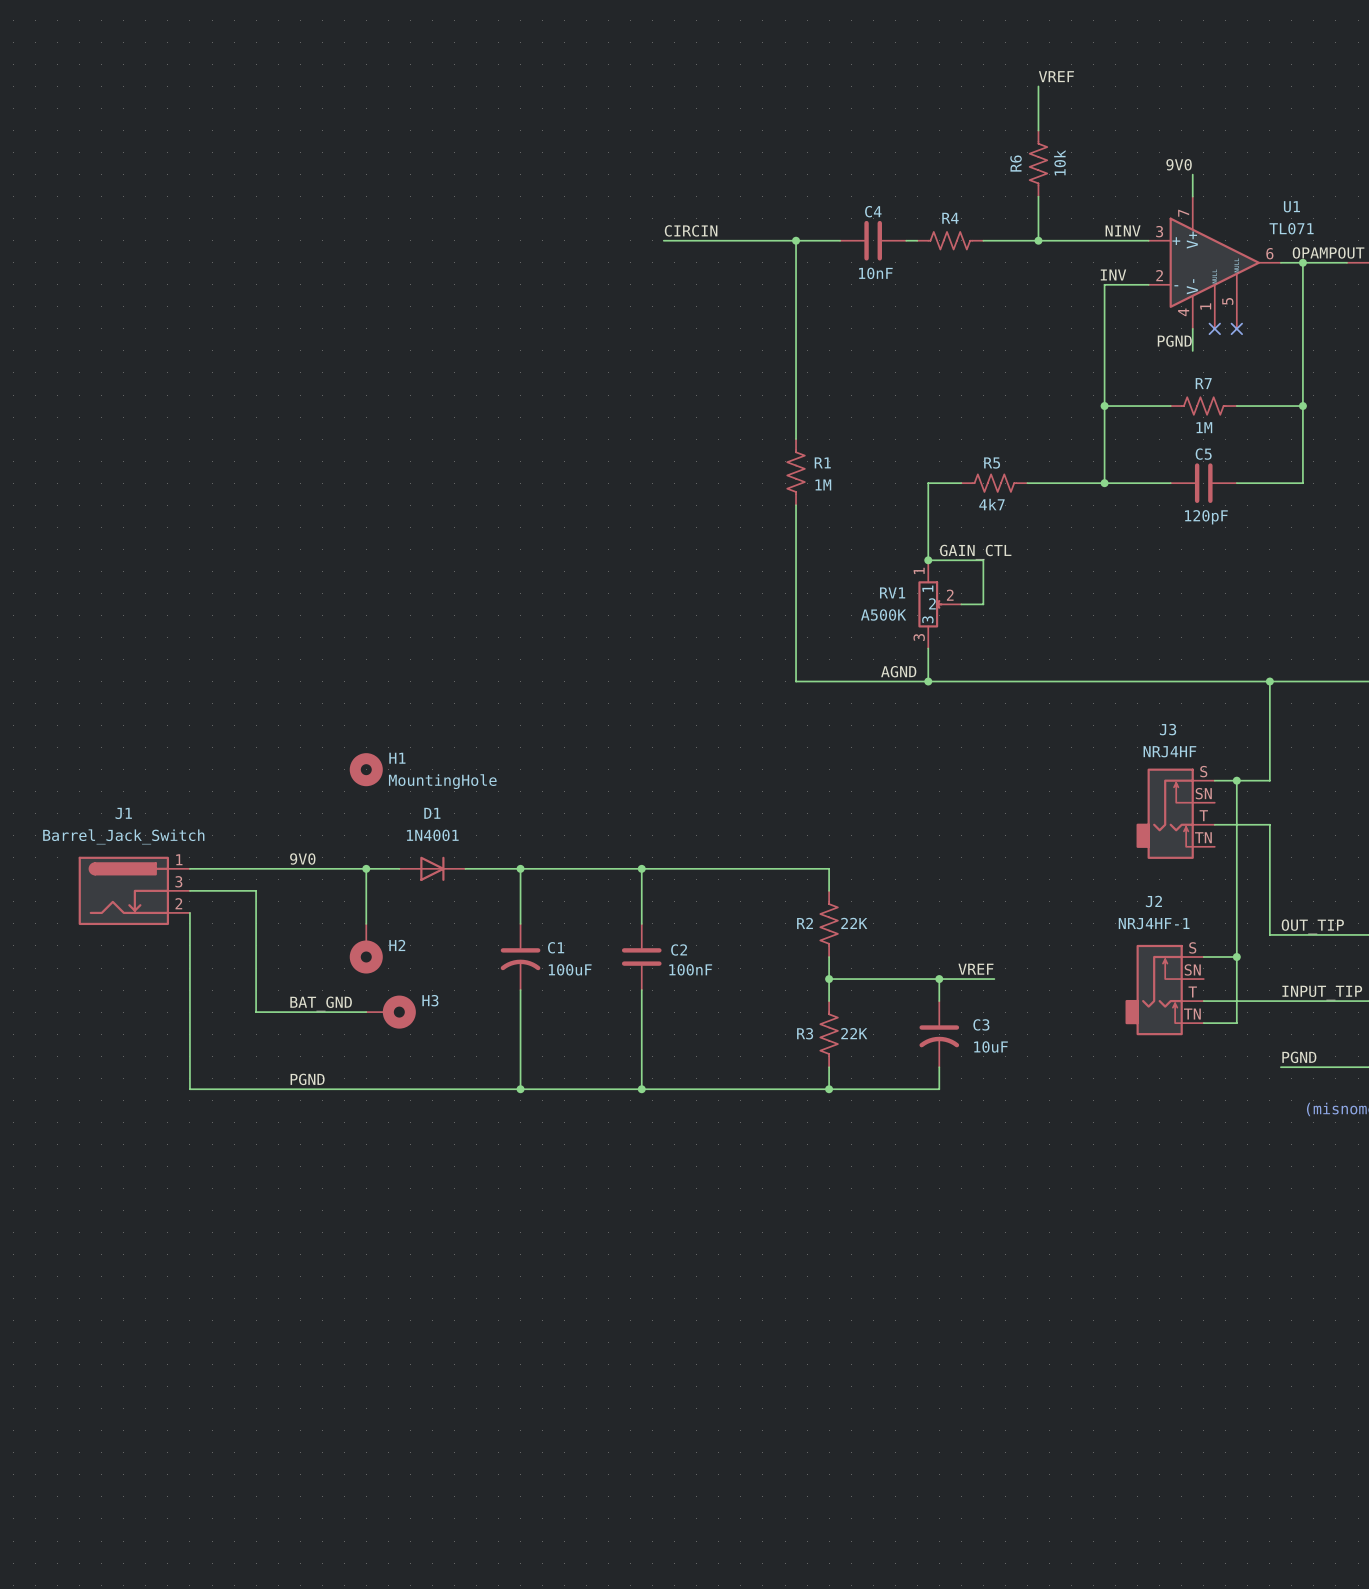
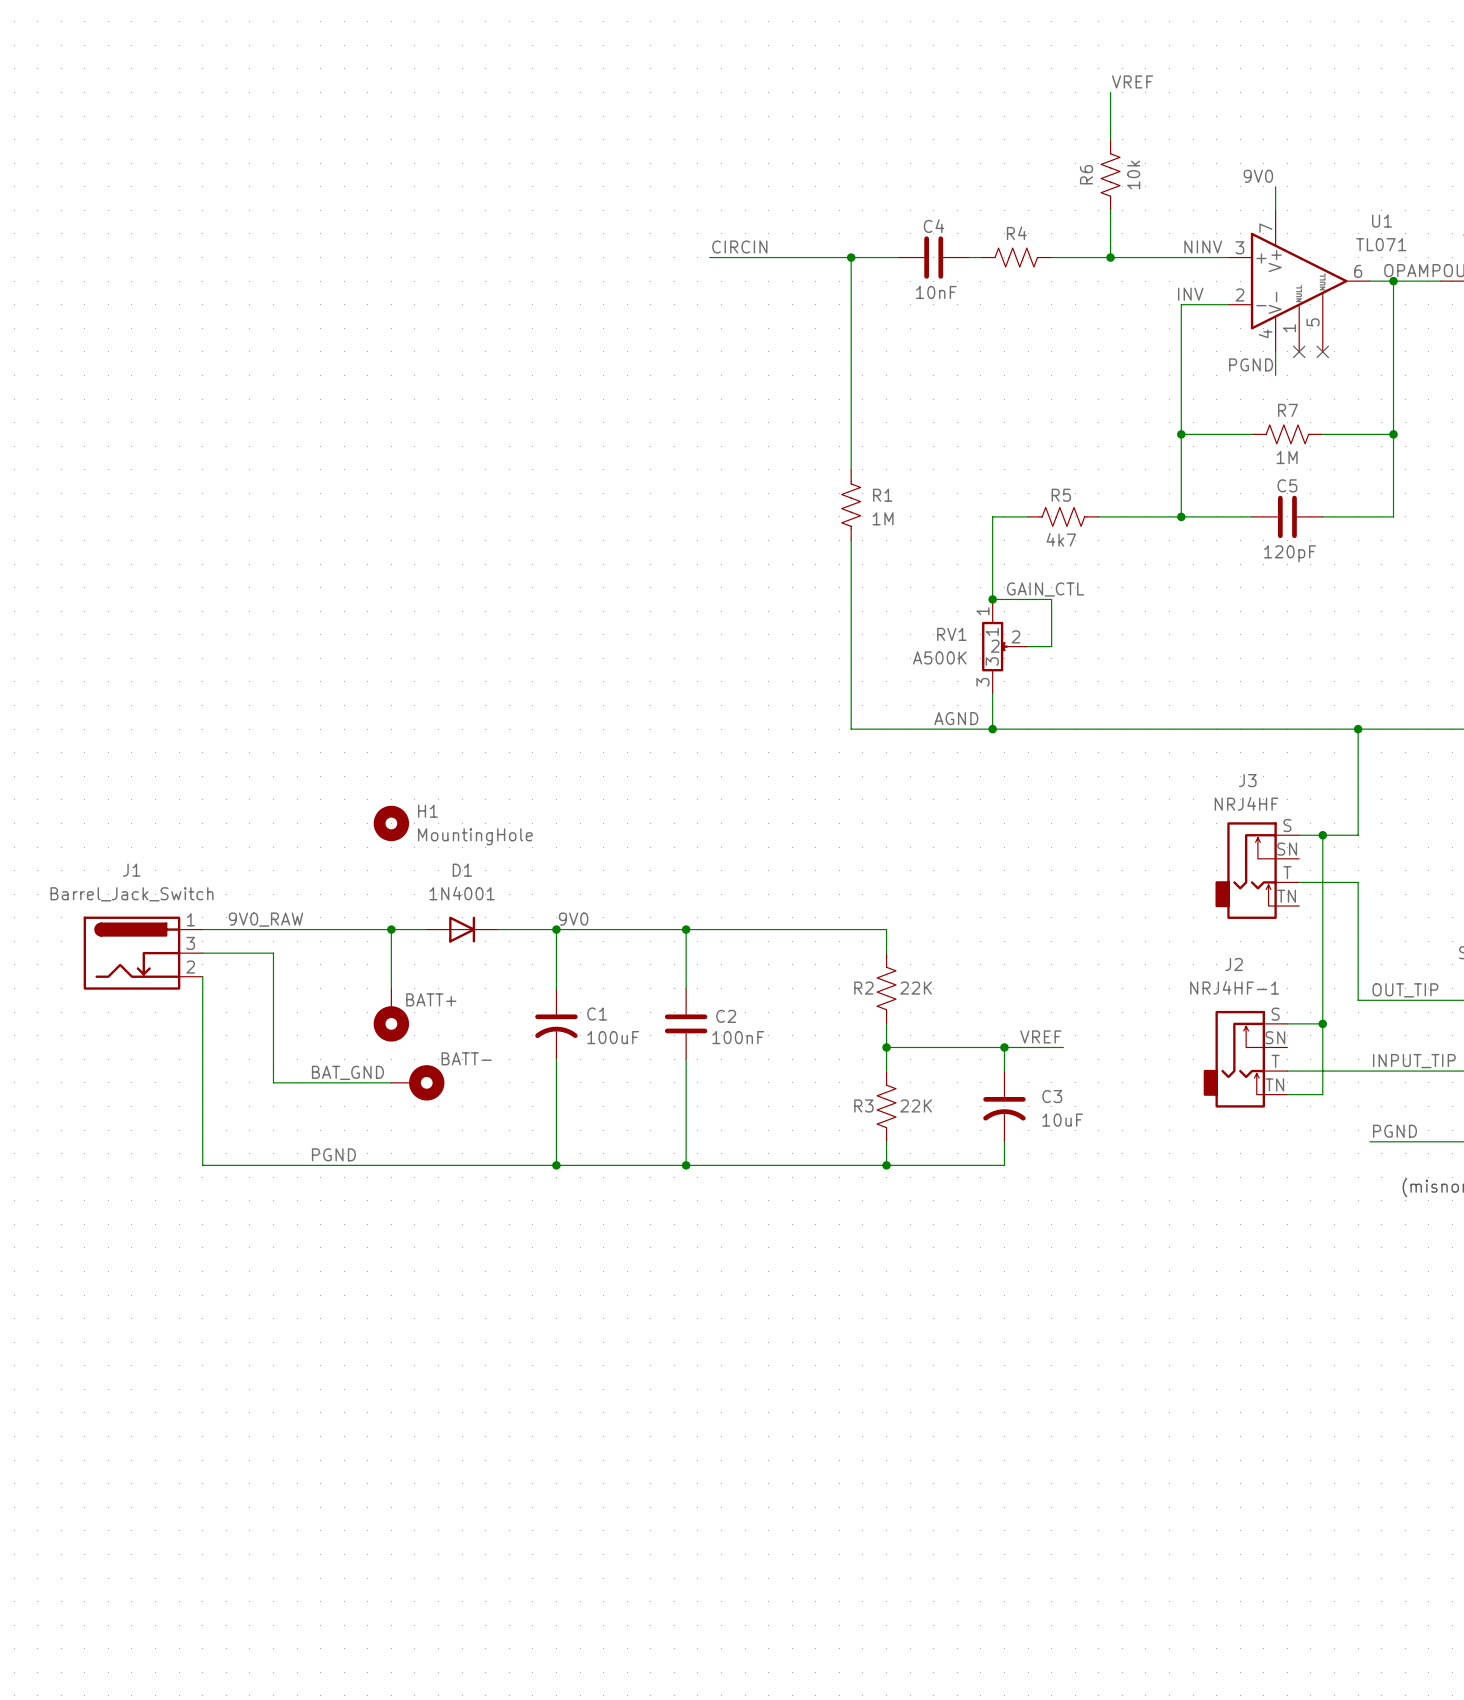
label: 9V0 (302, 859) -> none
label: none -> 9V0 (573, 919)
label: none -> 9V0_RAW (265, 919)
H2 value: none -> BATT+ (431, 999)
H2 name: H2 (397, 945) -> none
H3 value: none -> BATT- (466, 1058)
H3 name: H3 (430, 1000) -> none

